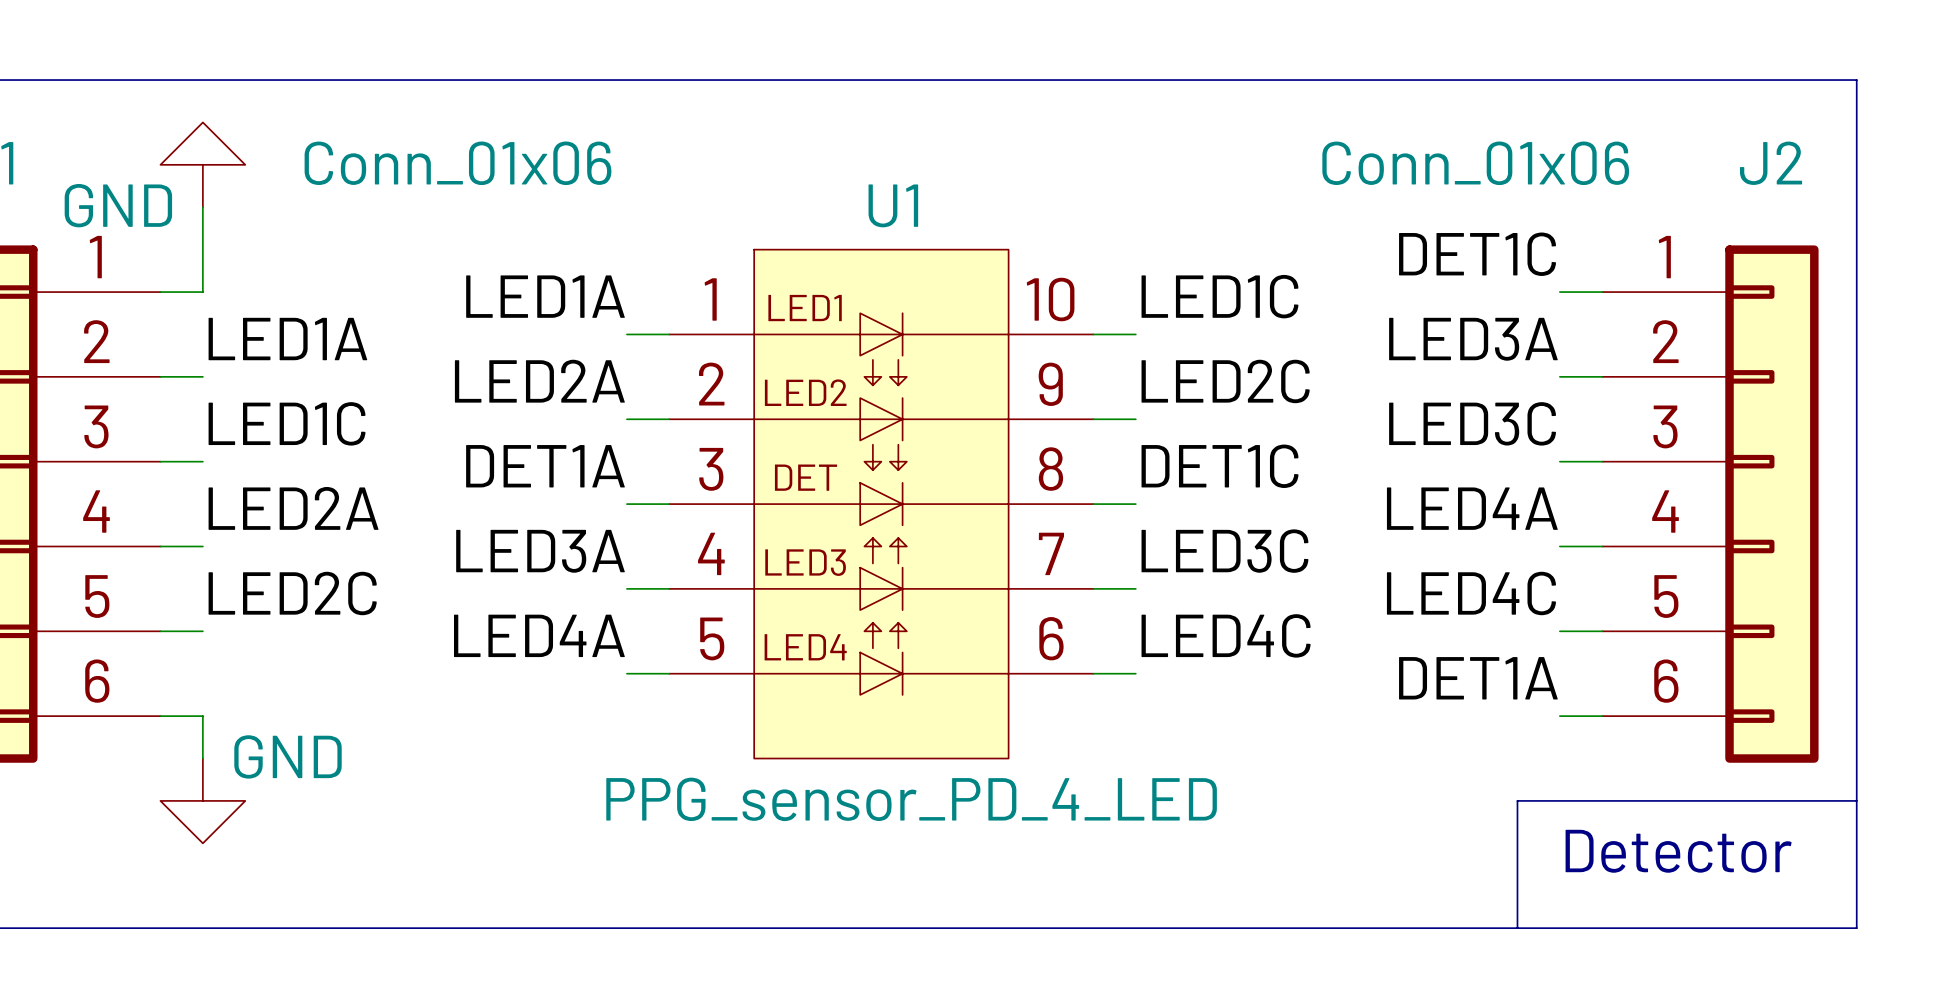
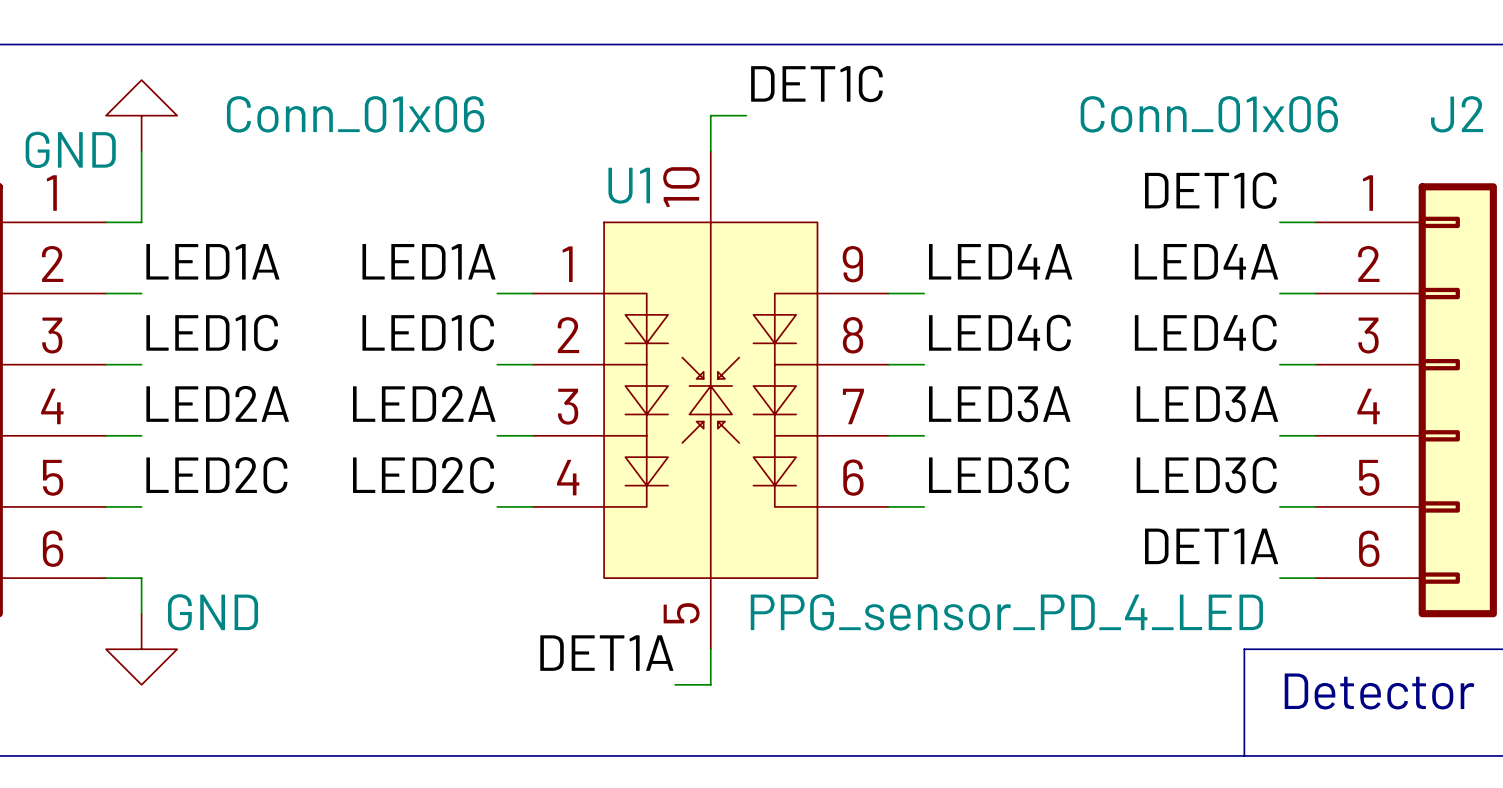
wire: none -> (746, 115) (710, 115) (710, 151)
U1 name position: U1 (893, 205) -> U1 (629, 185)
U1 symbol: [669, 249, 1094, 759] -> [532, 151, 889, 650]
label position: LED1A (545, 296) -> LED1A (429, 261)
label position: LED1C (1219, 296) -> LED1C (428, 332)
wire: (626, 334) (669, 334) -> (497, 293) (532, 293)
wire: (1093, 334) (1135, 334) -> (888, 293) (924, 293)
label: LED3A (1473, 339) -> LED4A (1206, 261)
label position: LED2A (539, 381) -> LED2A (424, 403)
label position: LED2C (1225, 381) -> LED2C (423, 475)
wire: (626, 419) (669, 419) -> (497, 364) (532, 364)
wire: (1093, 419) (1135, 419) -> (888, 364) (924, 364)
label: LED3C (1472, 423) -> LED4C (1205, 332)
label position: DET1A (545, 466) -> DET1A (606, 653)
label position: DET1C (1219, 466) -> DET1C (816, 83)
wire: (626, 504) (669, 504) -> none
wire: (1093, 504) (1135, 504) -> none
label: LED4A (1472, 508) -> LED3A (1207, 404)
label position: LED3A (540, 551) -> LED3A (999, 404)
label position: LED3C (1224, 551) -> LED3C (998, 475)
wire: (626, 588) (669, 588) -> (497, 435) (532, 435)
wire: (1093, 588) (1135, 588) -> (888, 435) (924, 435)
label: LED4C (1471, 593) -> LED3C (1206, 475)
label position: LED4A (539, 635) -> LED4A (1000, 261)
label position: LED4C (1226, 635) -> LED4C (999, 332)
wire: (626, 673) (669, 673) -> (497, 506) (532, 506)
wire: (1093, 673) (1135, 673) -> (888, 506) (924, 506)
U1 value position: PPG_sensor_PD_4_LED (911, 799) -> PPG_sensor_PD_4_LED (1006, 612)
wire: none -> (710, 649) (710, 684) (675, 684)

